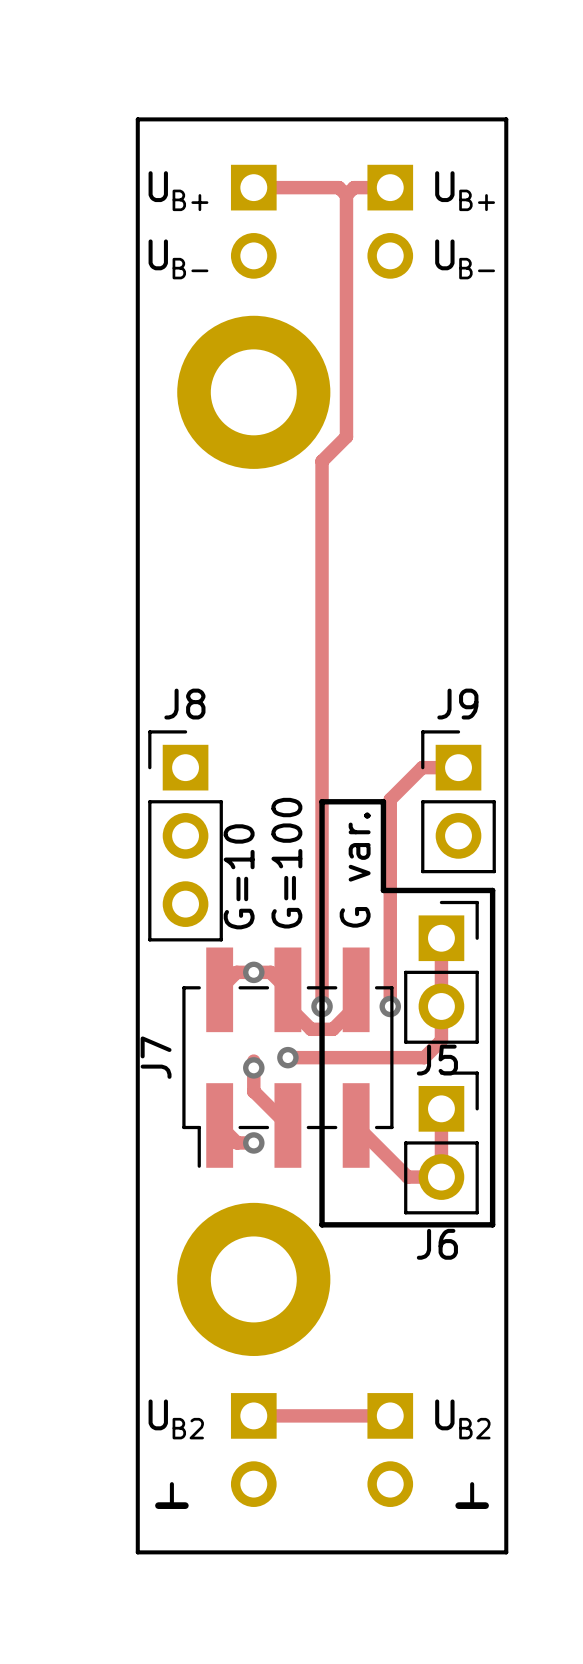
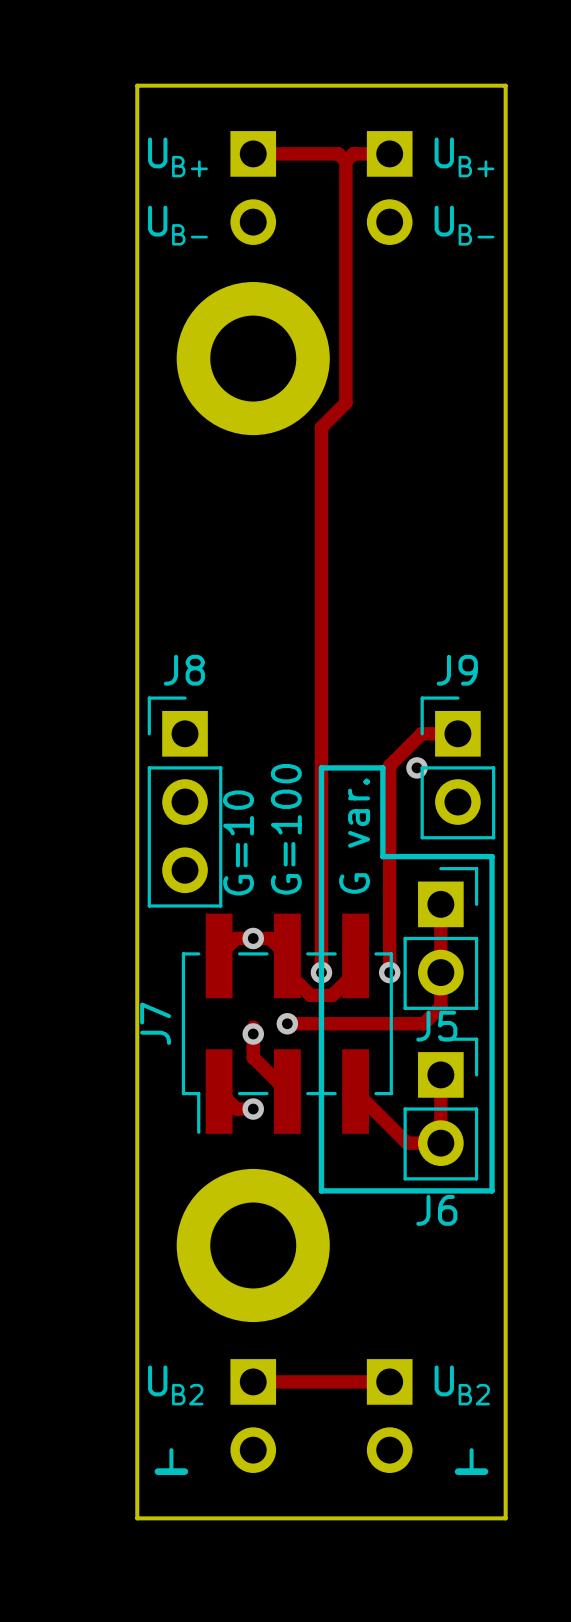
via: none -> (416, 767)

